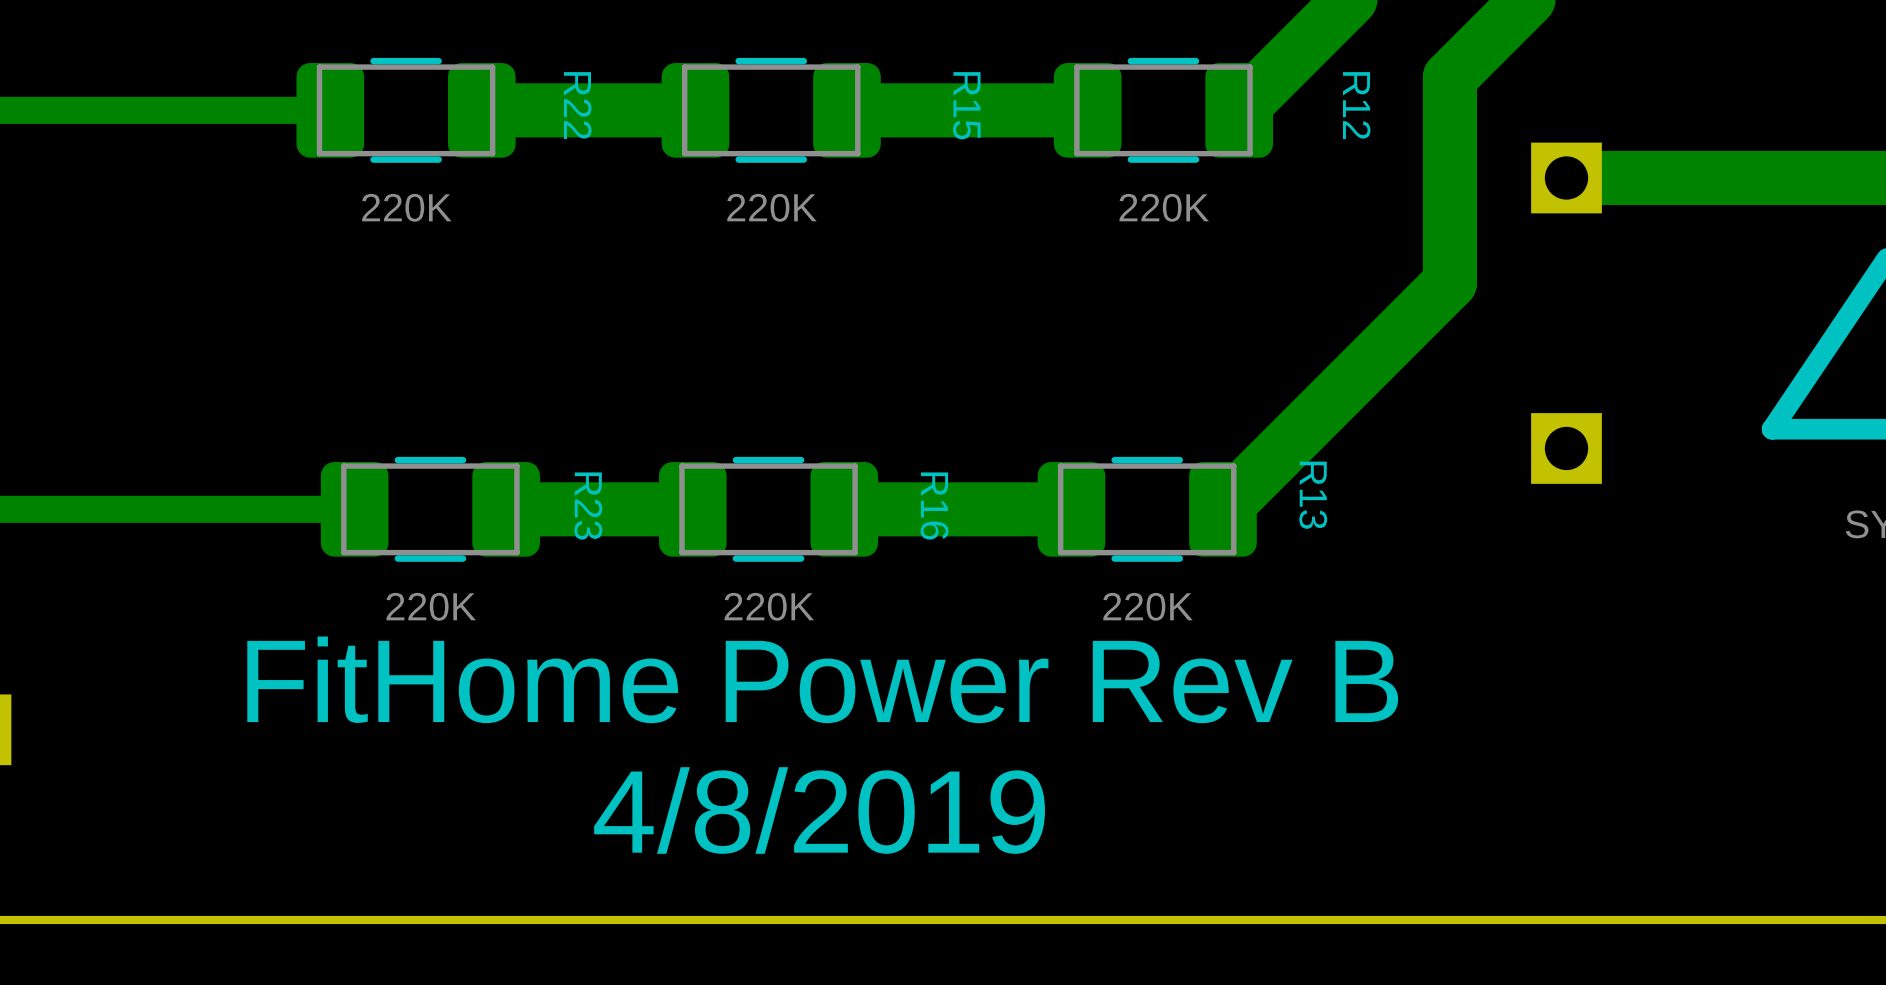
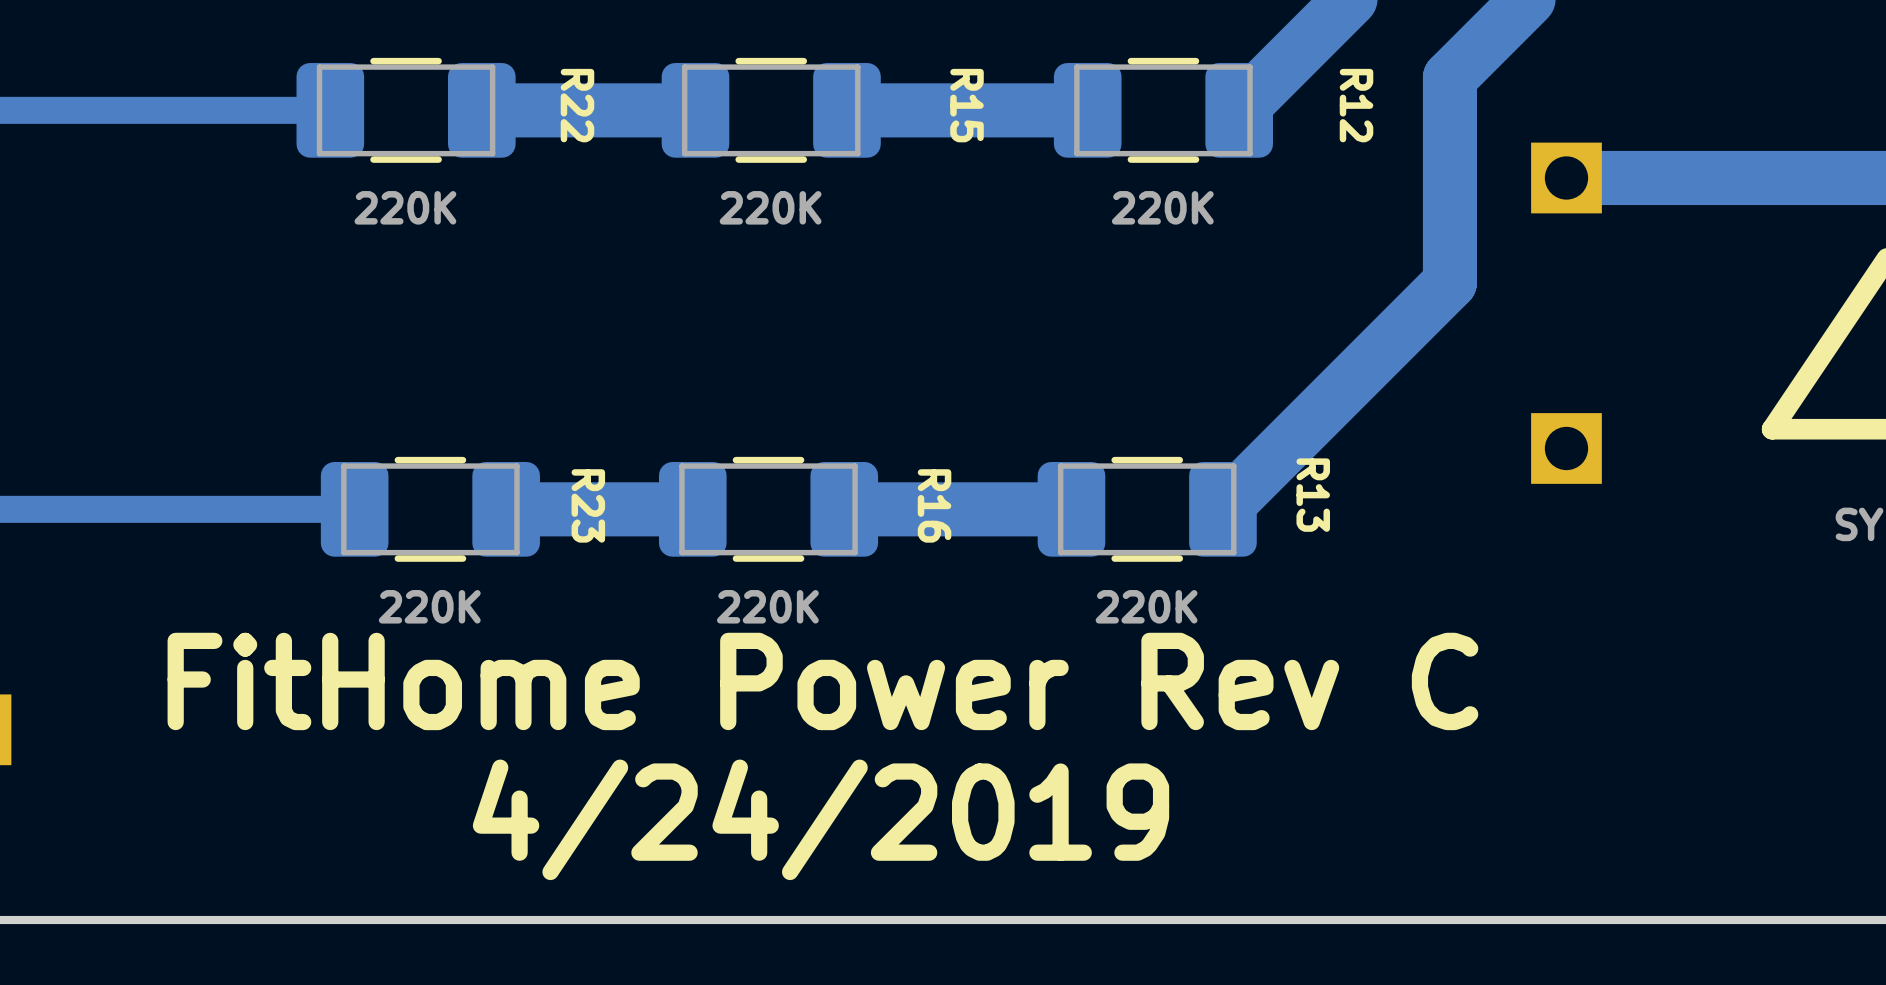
text: FitHome Power Rev B (822, 679) -> FitHome Power Rev C (822, 681)
text: 4/8/2019 (819, 810) -> 4/24/2019 (821, 819)

